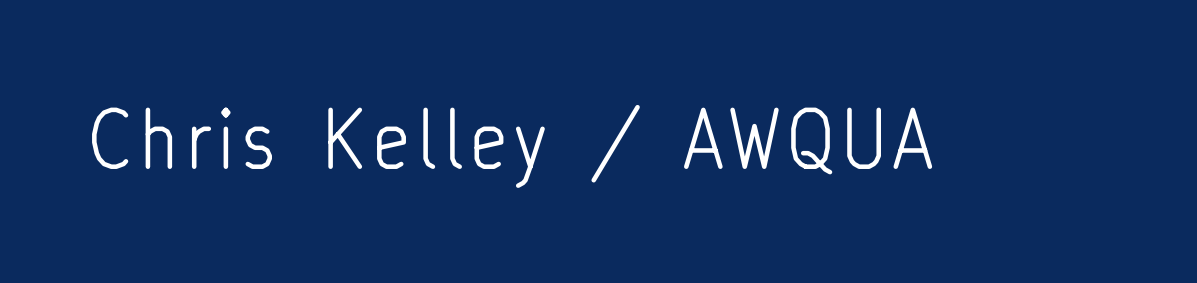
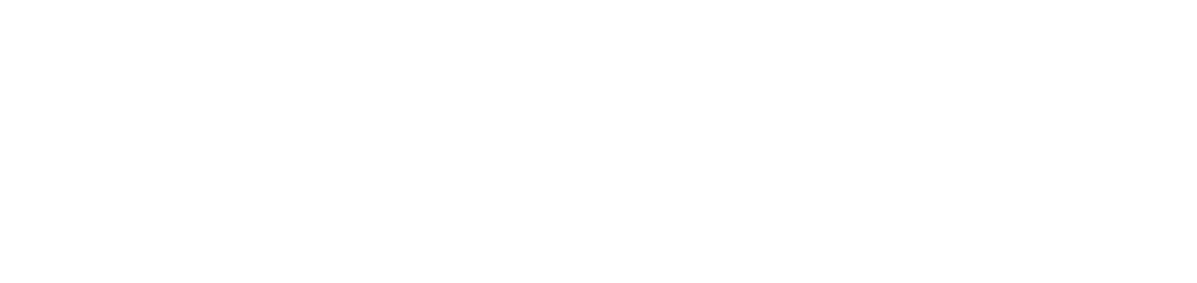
text: Chris Kelley / AWQUA (512, 146) -> none

